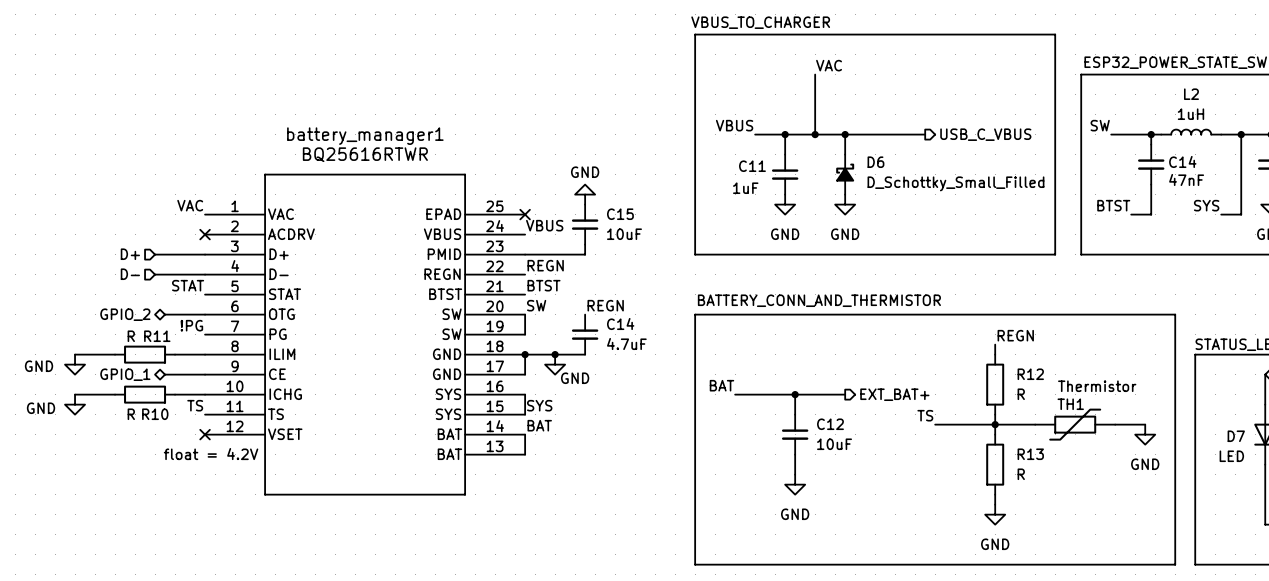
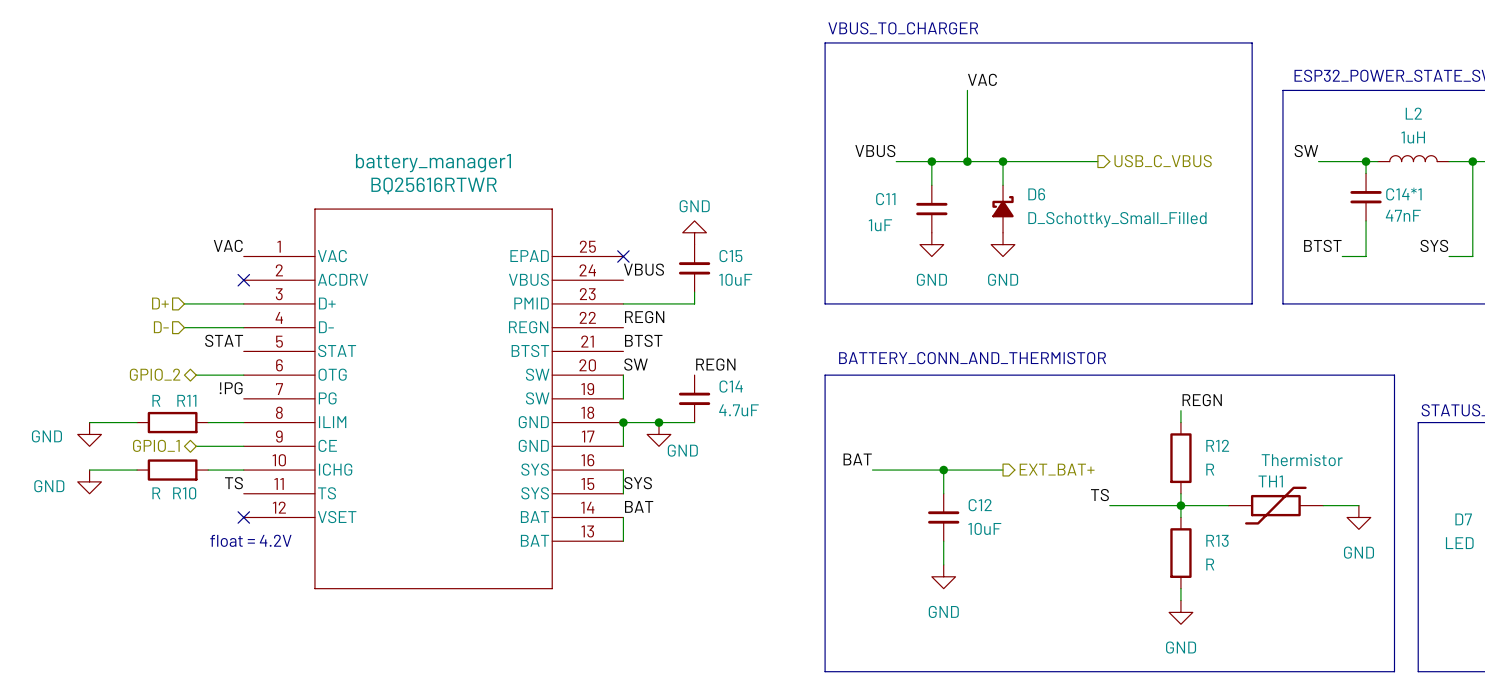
C14 name: C14 (1182, 161) -> C14*1 (1403, 194)

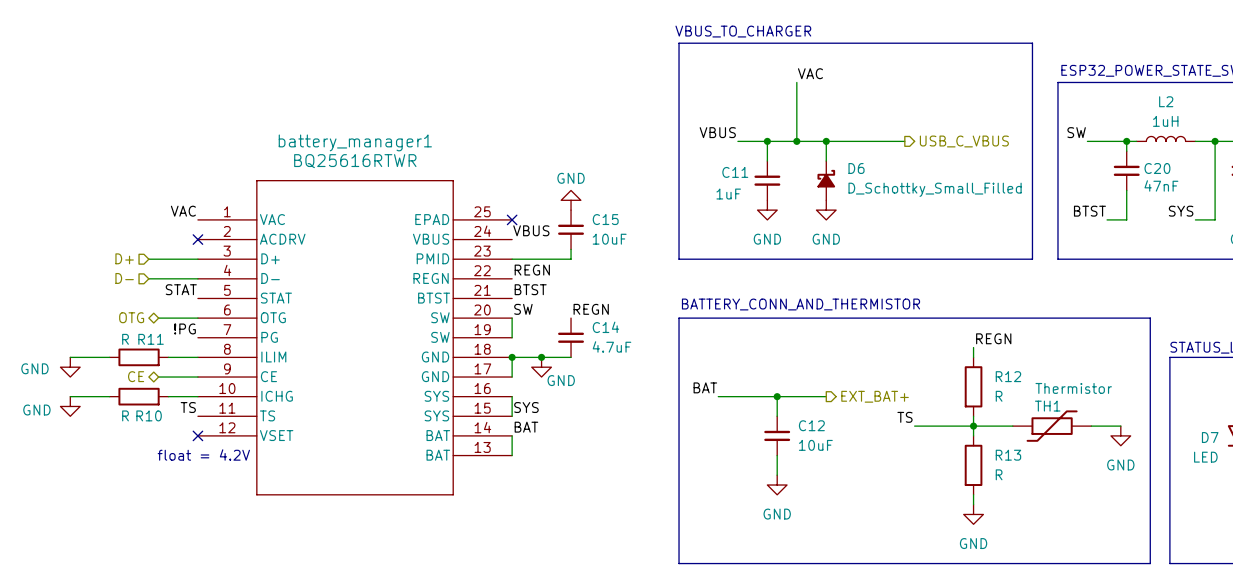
C14*1 name: C14*1 (1403, 194) -> C20 (1157, 168)
hierarchical label: GPIO_2 (155, 374) -> OTG (131, 317)
hierarchical label: GPIO_1 (156, 445) -> CE (136, 376)

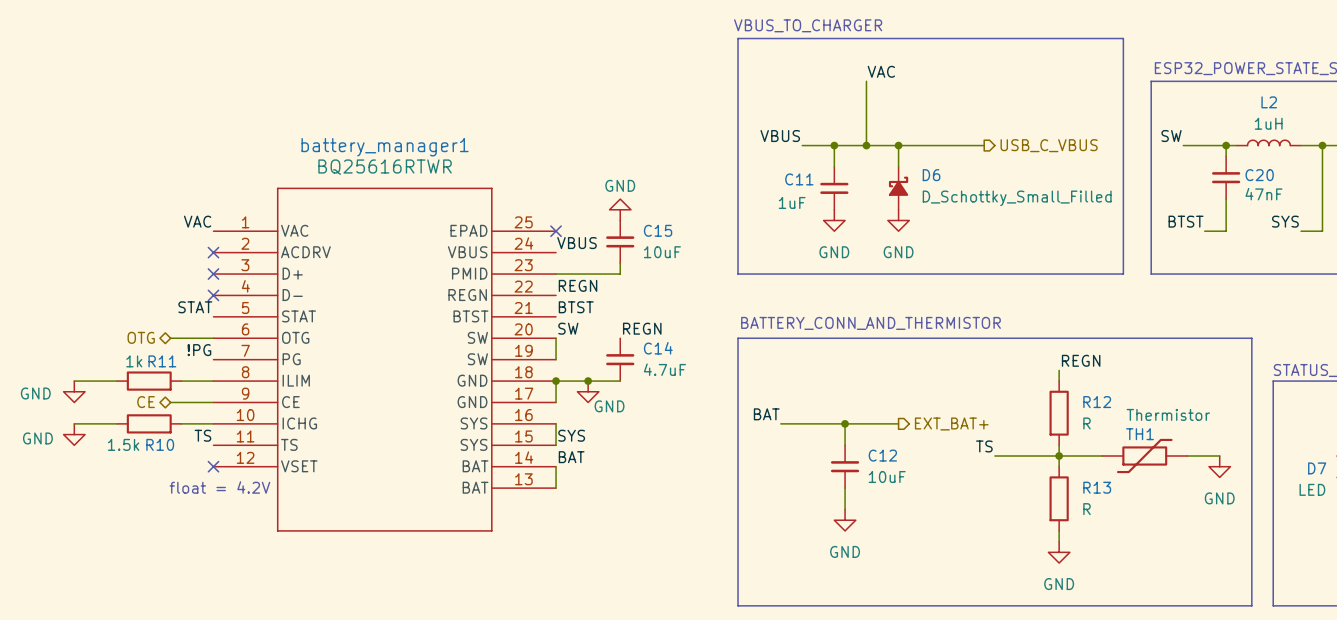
hierarchical label: D+ (124, 258) -> none
wire: (148, 259) (197, 259) -> none
no-connect mark: none -> (213, 274)
hierarchical label: D- (124, 278) -> none
wire: (148, 278) (197, 278) -> none
no-connect mark: none -> (213, 295)
R11 value: R (125, 339) -> 1k (134, 361)
R10 value: R (125, 415) -> 1.5k (123, 444)

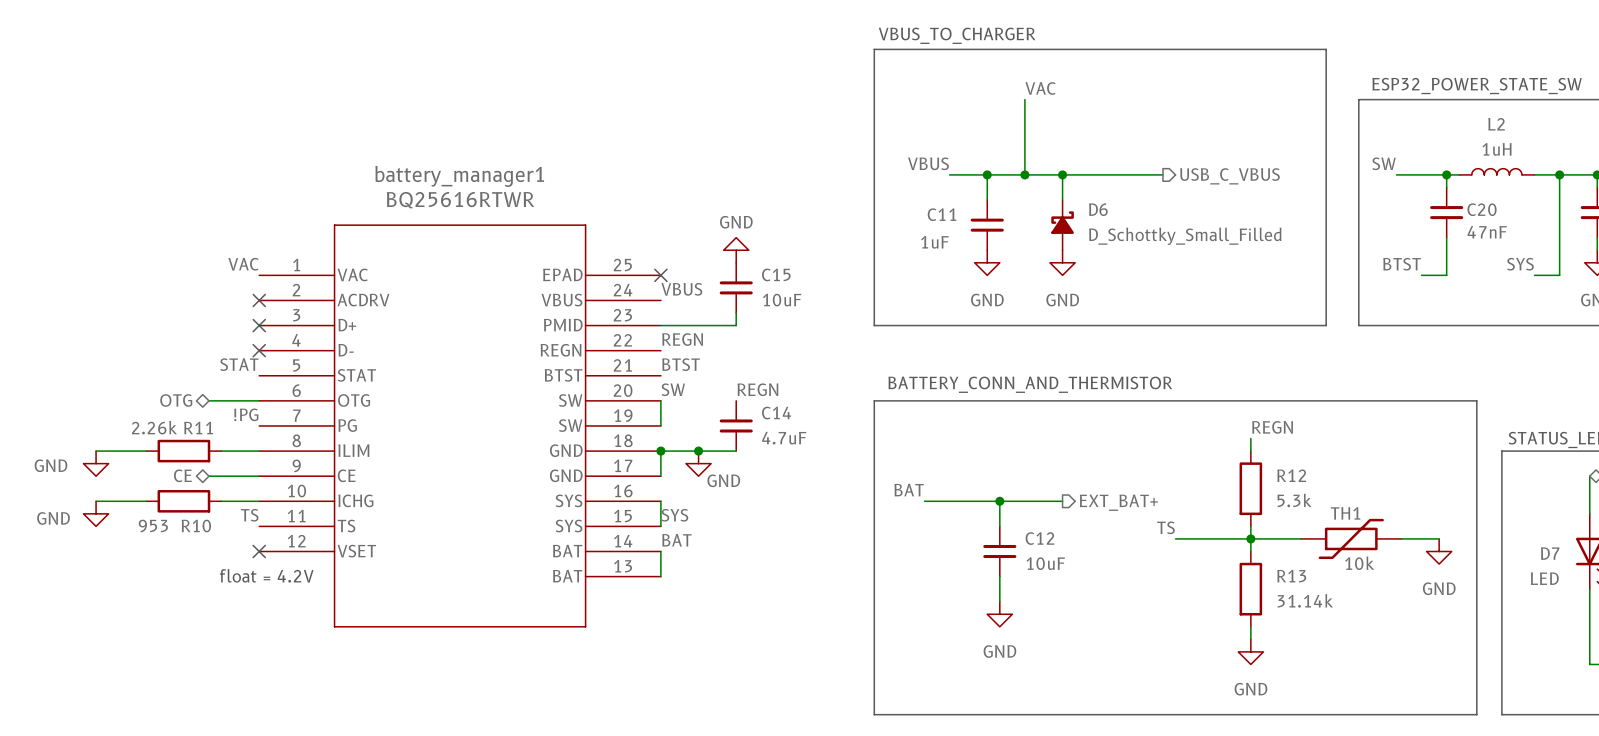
R11 value: 1k (134, 361) -> 2.26k (154, 427)
TH1 value: Thermistor (1168, 414) -> 10k (1359, 563)
R12 value: R (1087, 423) -> 5.3k (1294, 500)
R10 value: 1.5k (123, 444) -> 953 (153, 526)
R13 value: R (1087, 509) -> 31.14k (1305, 600)

